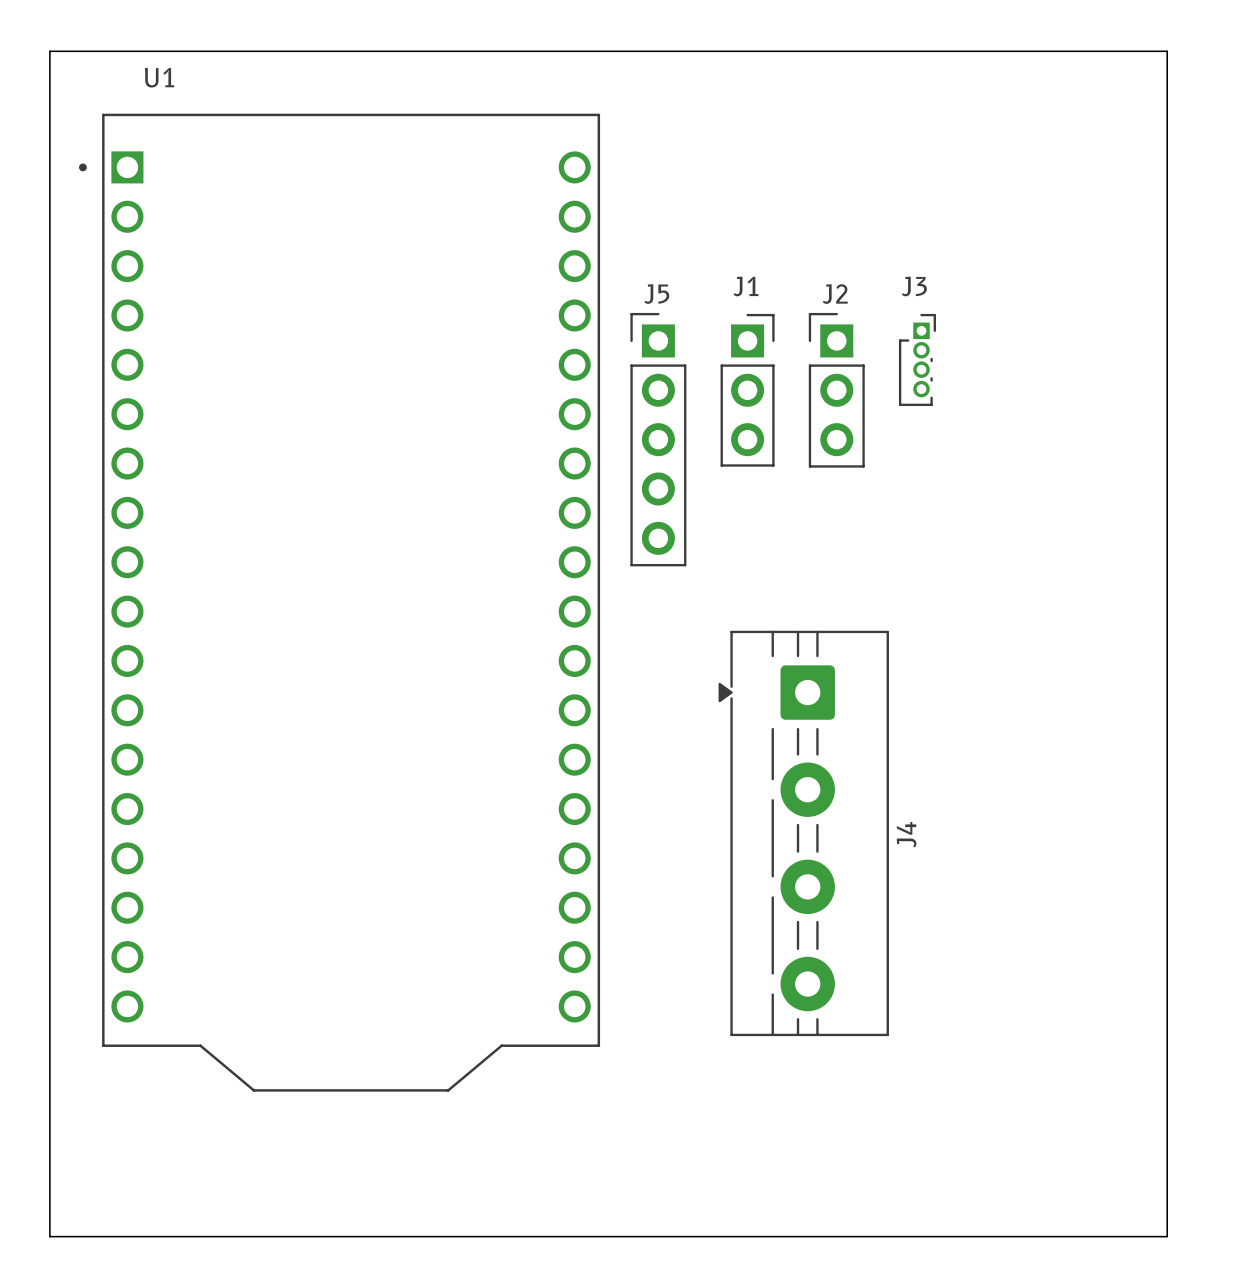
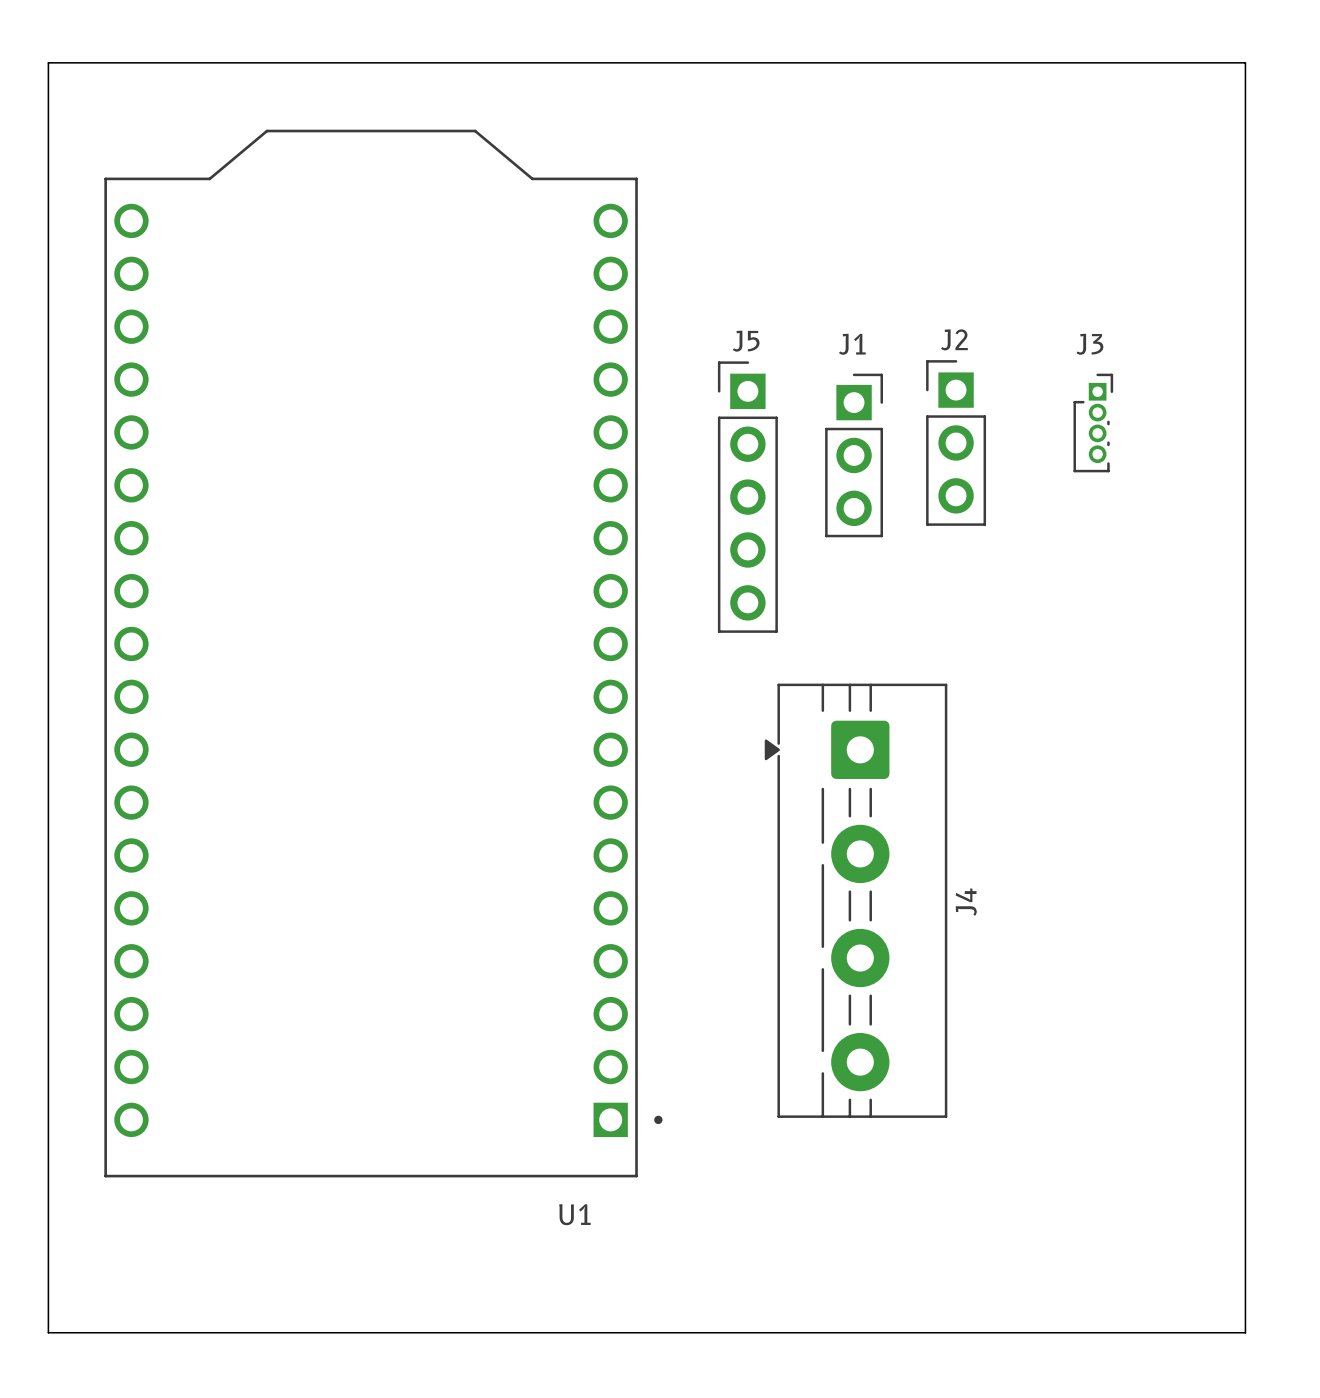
J3 position: (917, 359) -> (1093, 422)
J1 position: (747, 390) -> (854, 455)
J2 position: (836, 390) -> (956, 442)
J5 position: (658, 439) -> (747, 497)
U1 rotation: 0° (339, 602) -> 180° (383, 653)

